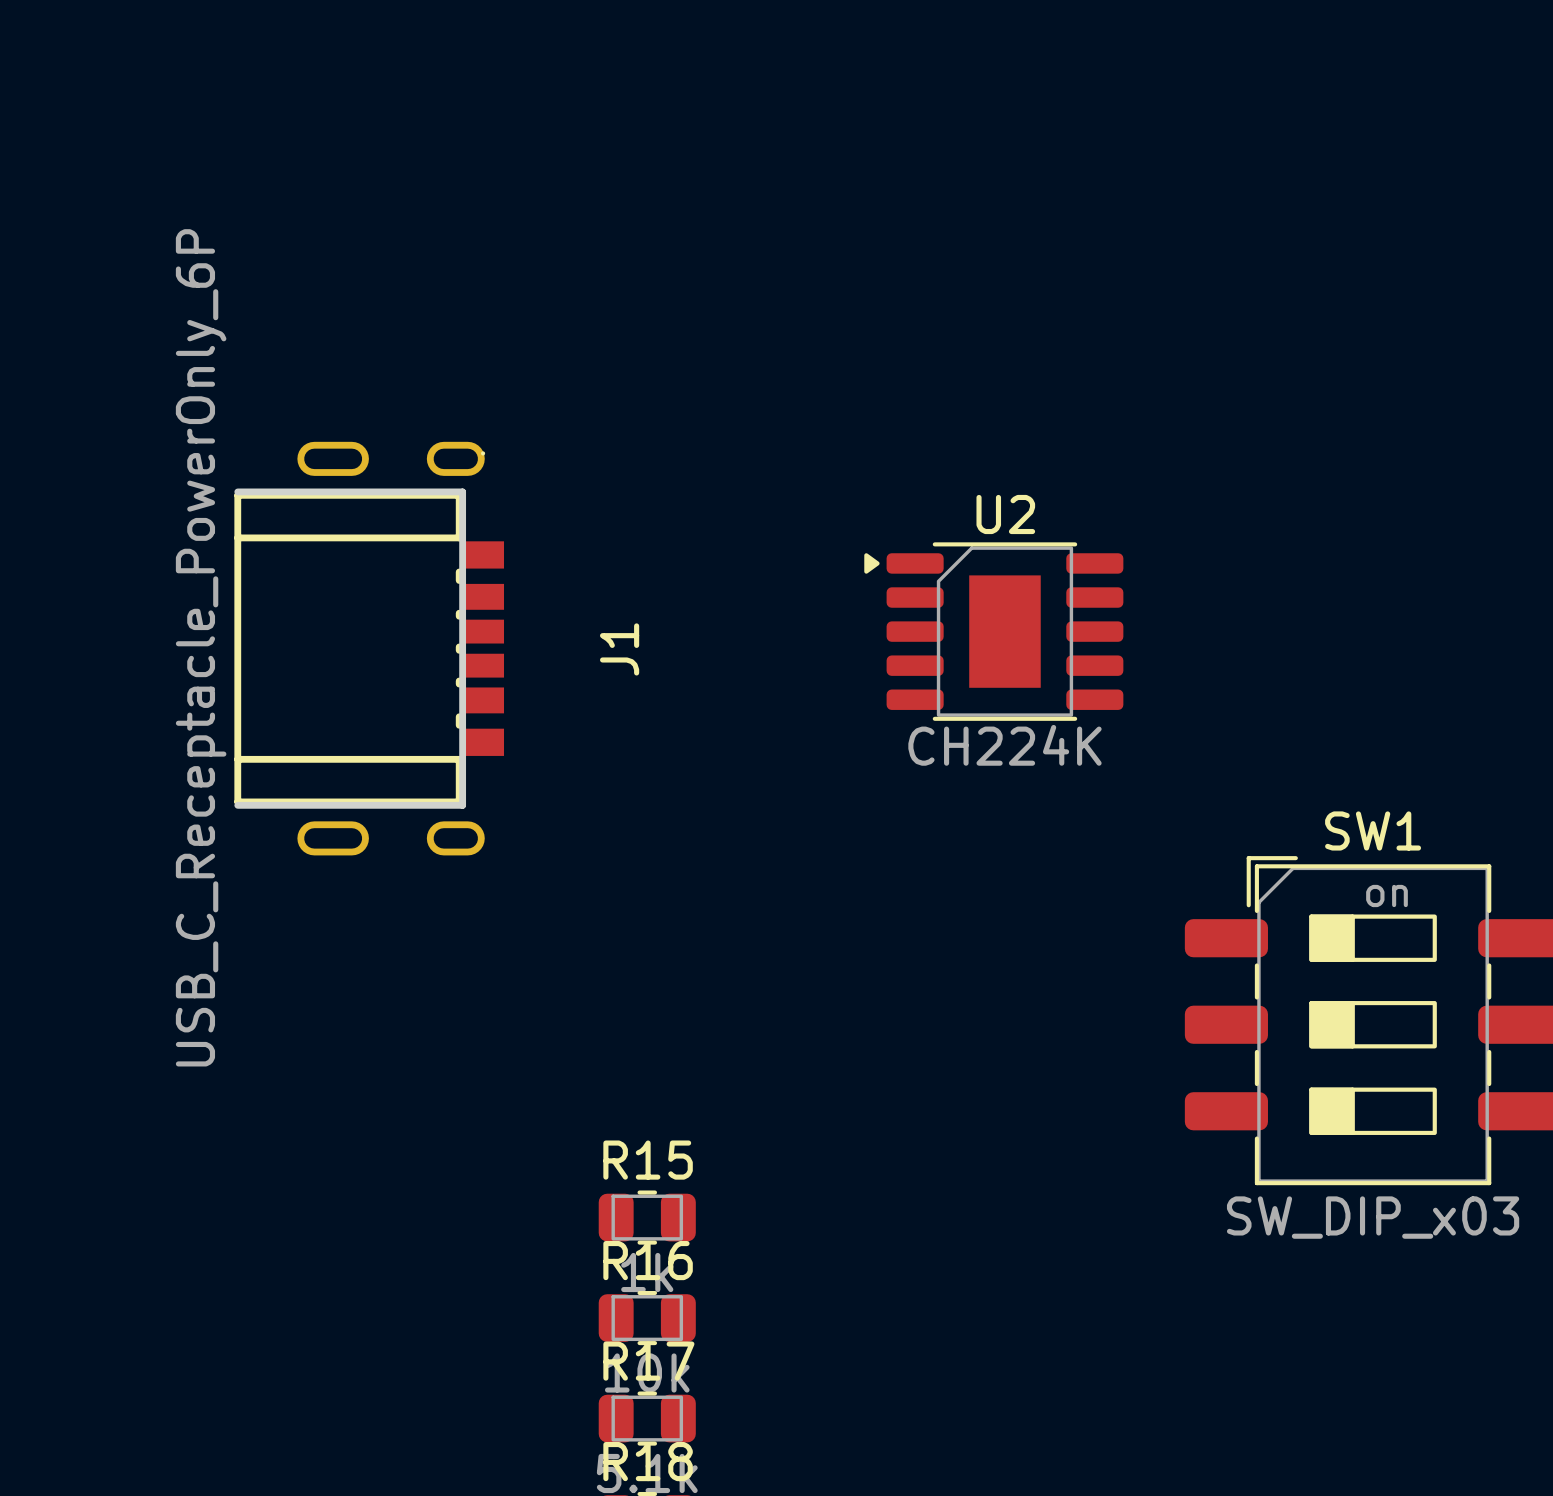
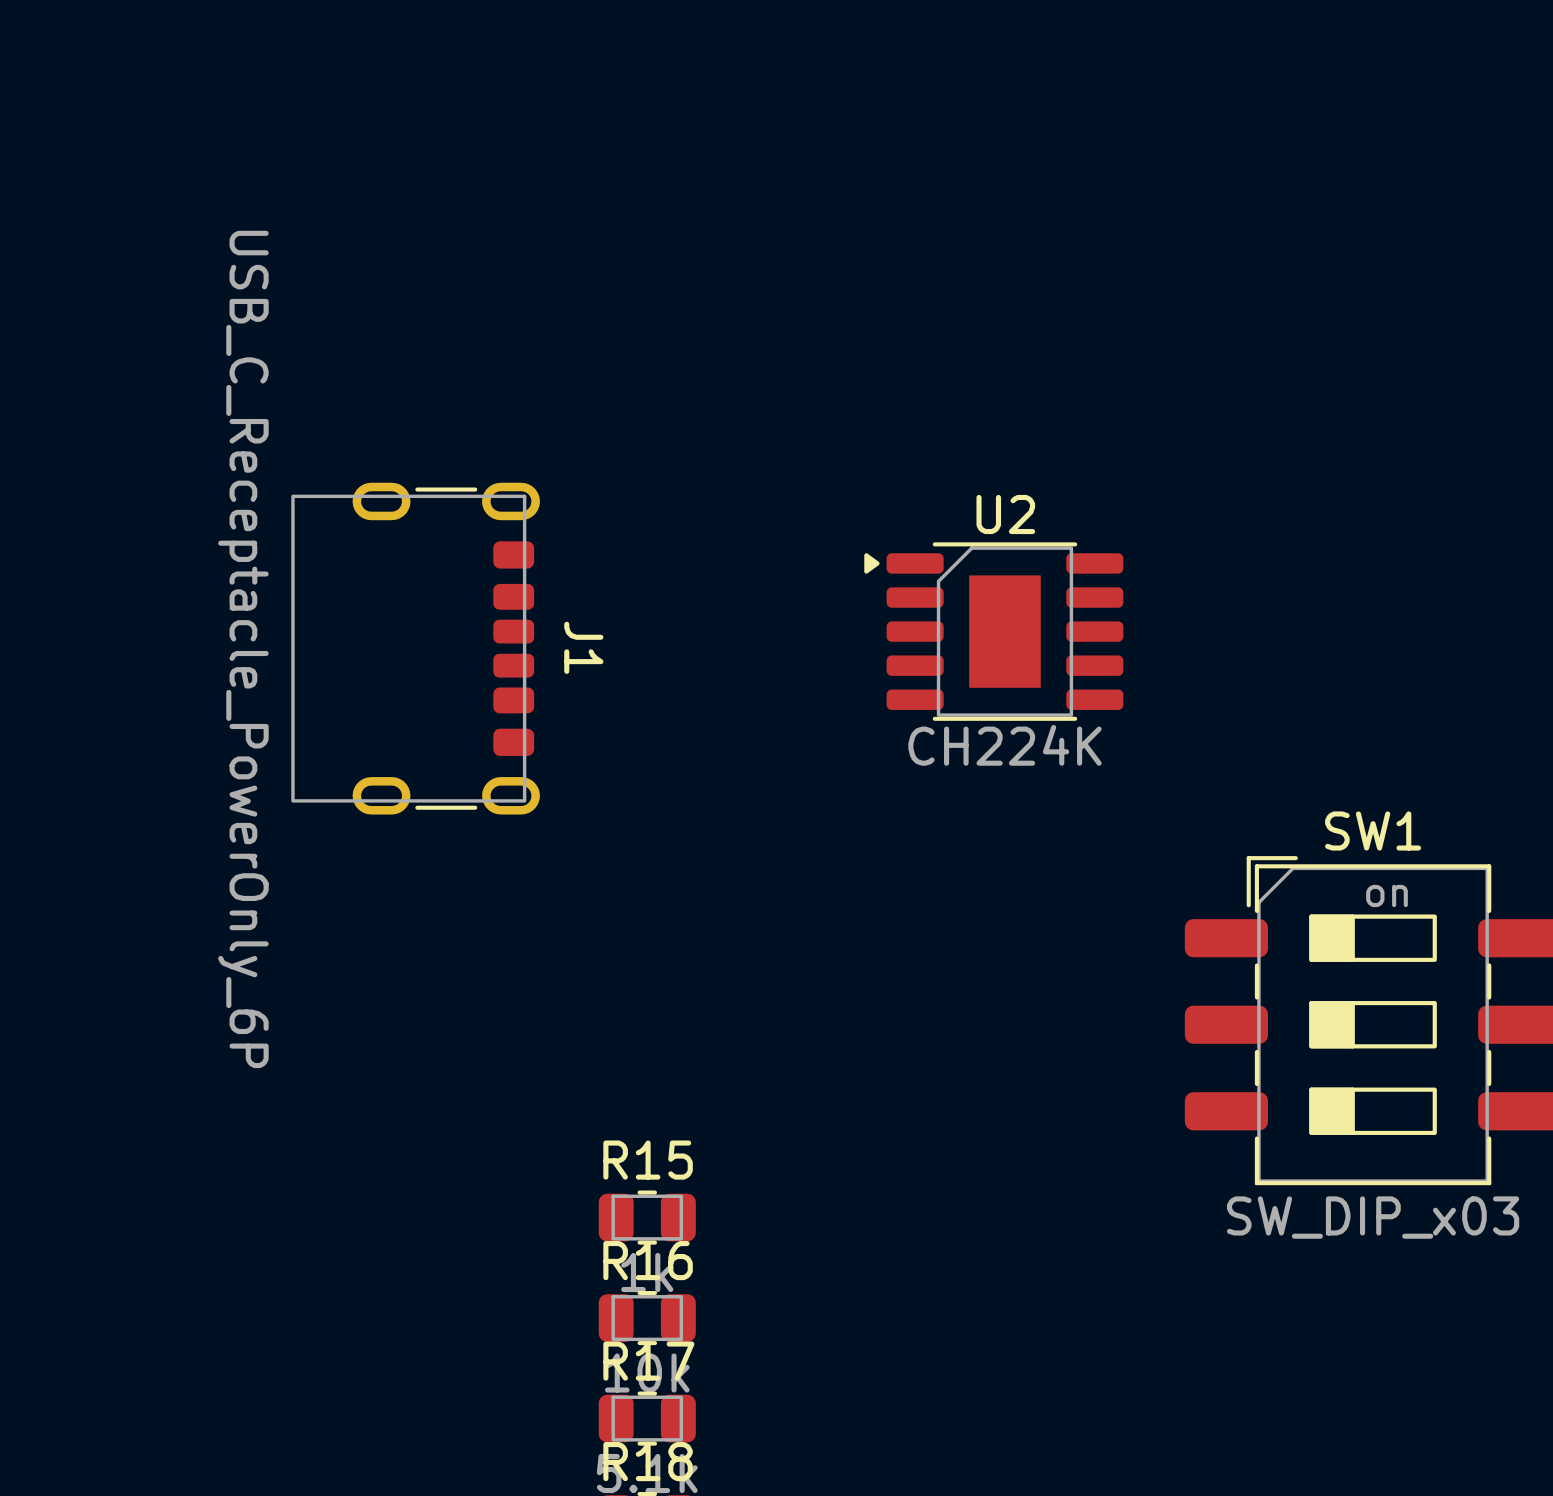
J1 footprint: [234, 441, 505, 856] -> [291, 482, 540, 815]
J1 name position: J1 (619, 649) -> J1 (583, 647)

